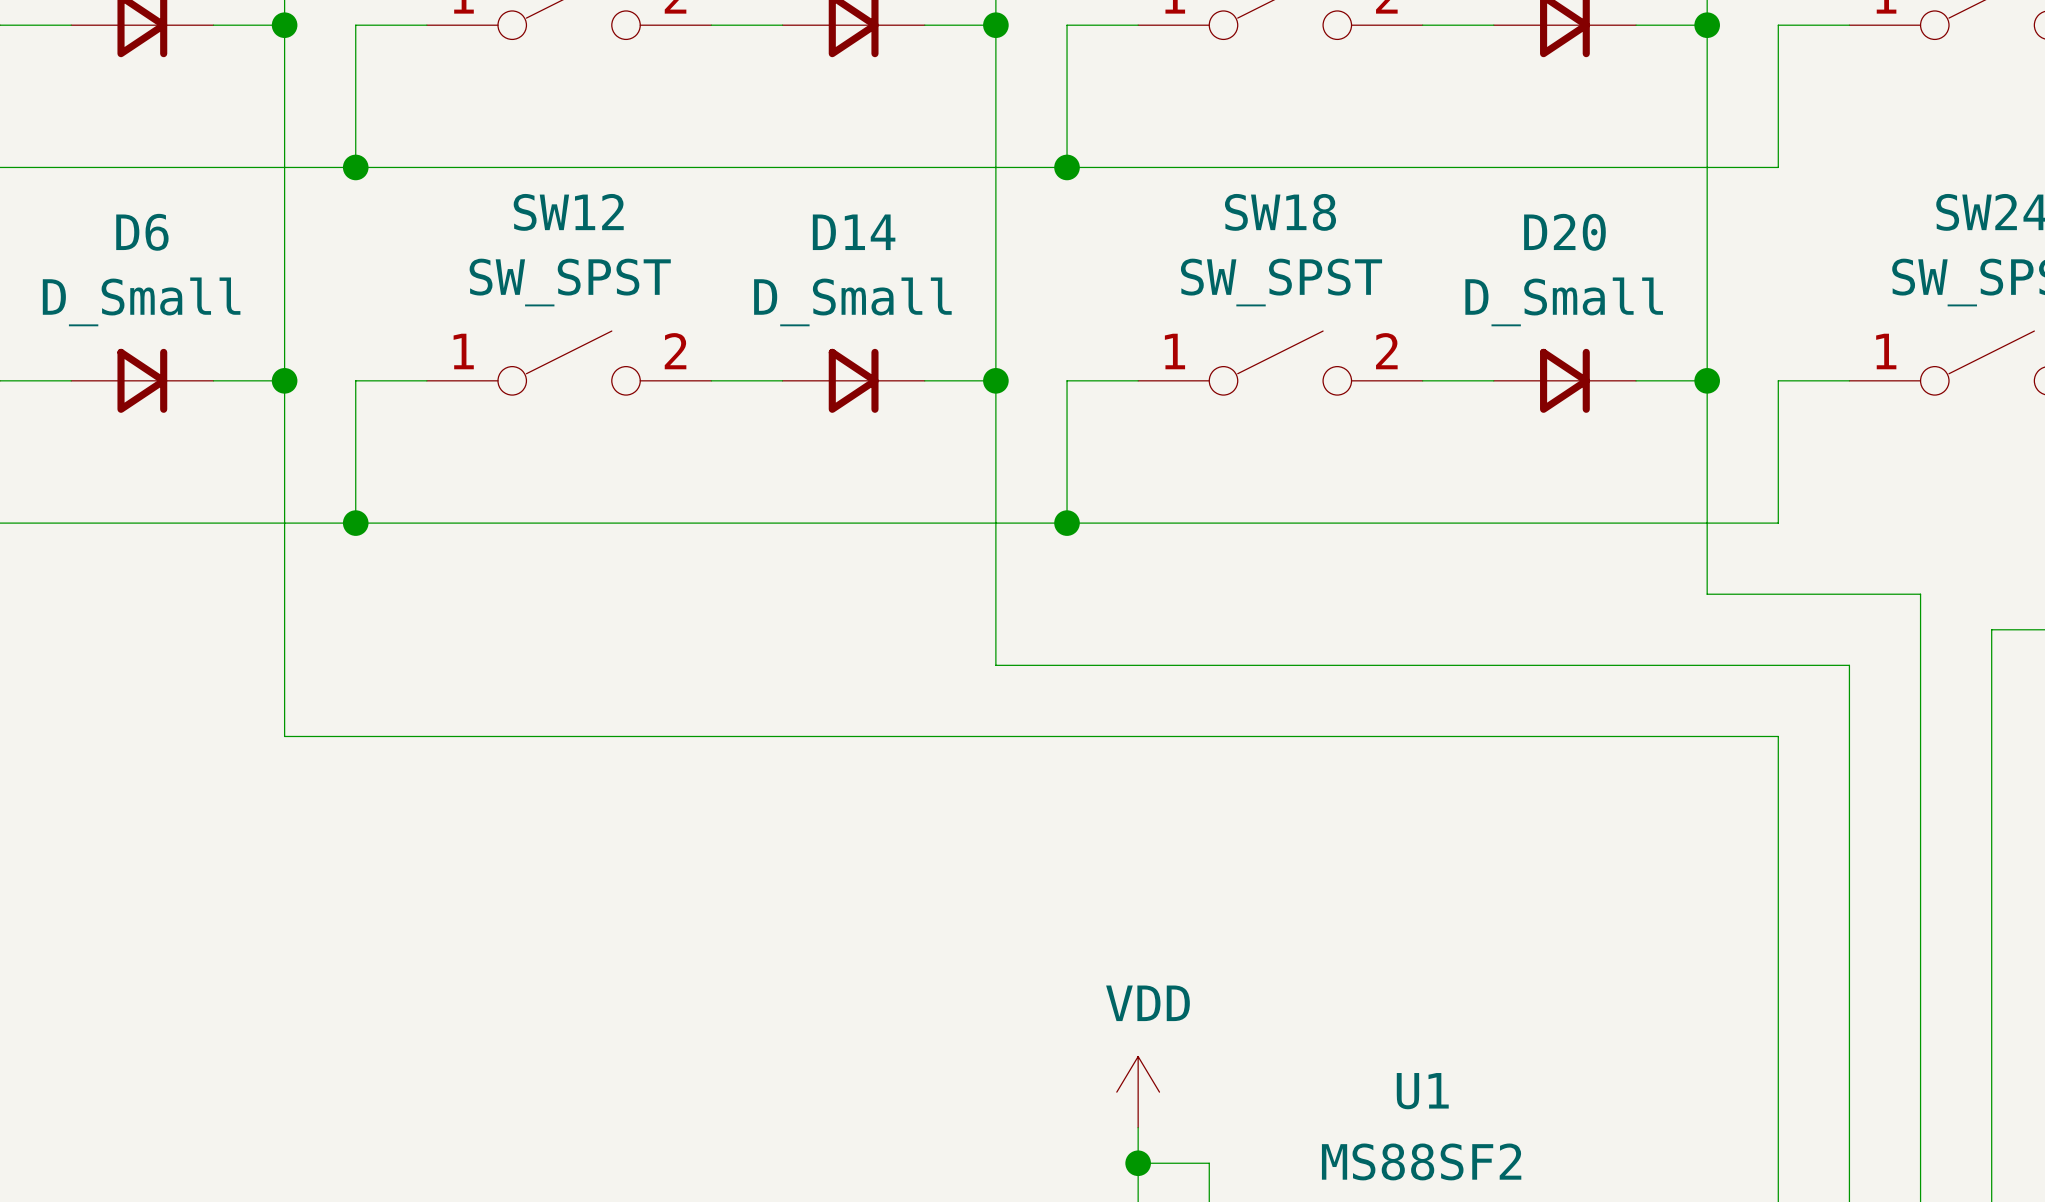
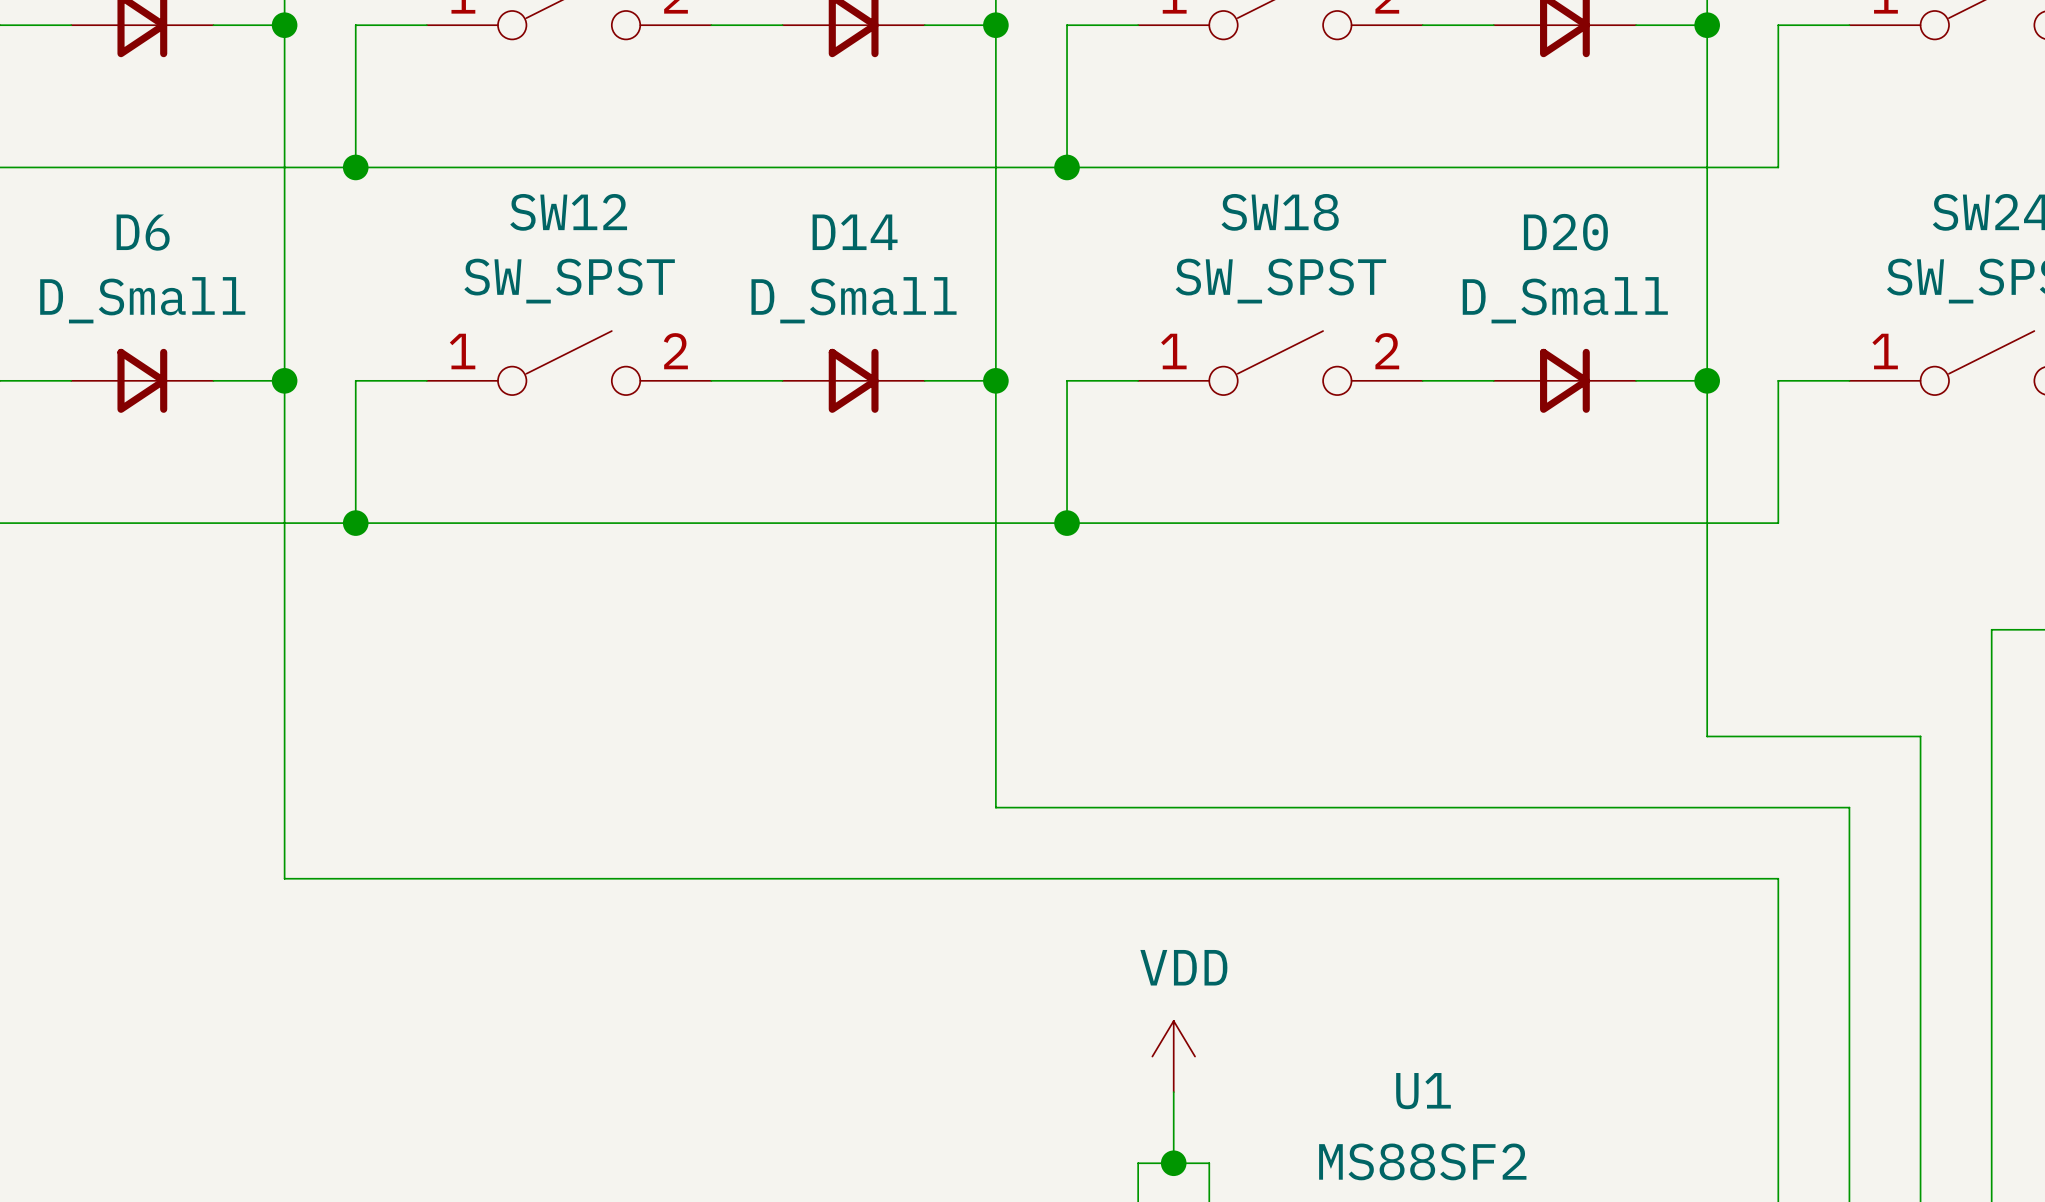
wire: (1707, 594) (1920, 594) (1920, 736) -> (1778, 736) (1920, 736)
wire: (995, 665) (1849, 665) (1849, 807) -> (995, 665) (995, 807) (1849, 807)
wire: (284, 736) (1707, 736) -> (284, 736) (284, 878) (1778, 878)
wire: (1778, 736) (1778, 878) -> (1707, 594) (1707, 736)
power symbol position: VDD (1138, 1092) -> VDD (1173, 1056)
wire: none -> (1173, 1092) (1173, 1163)
wire: (1138, 1127) (1138, 1163) -> none
junction position: (1138, 1163) -> (1173, 1163)

